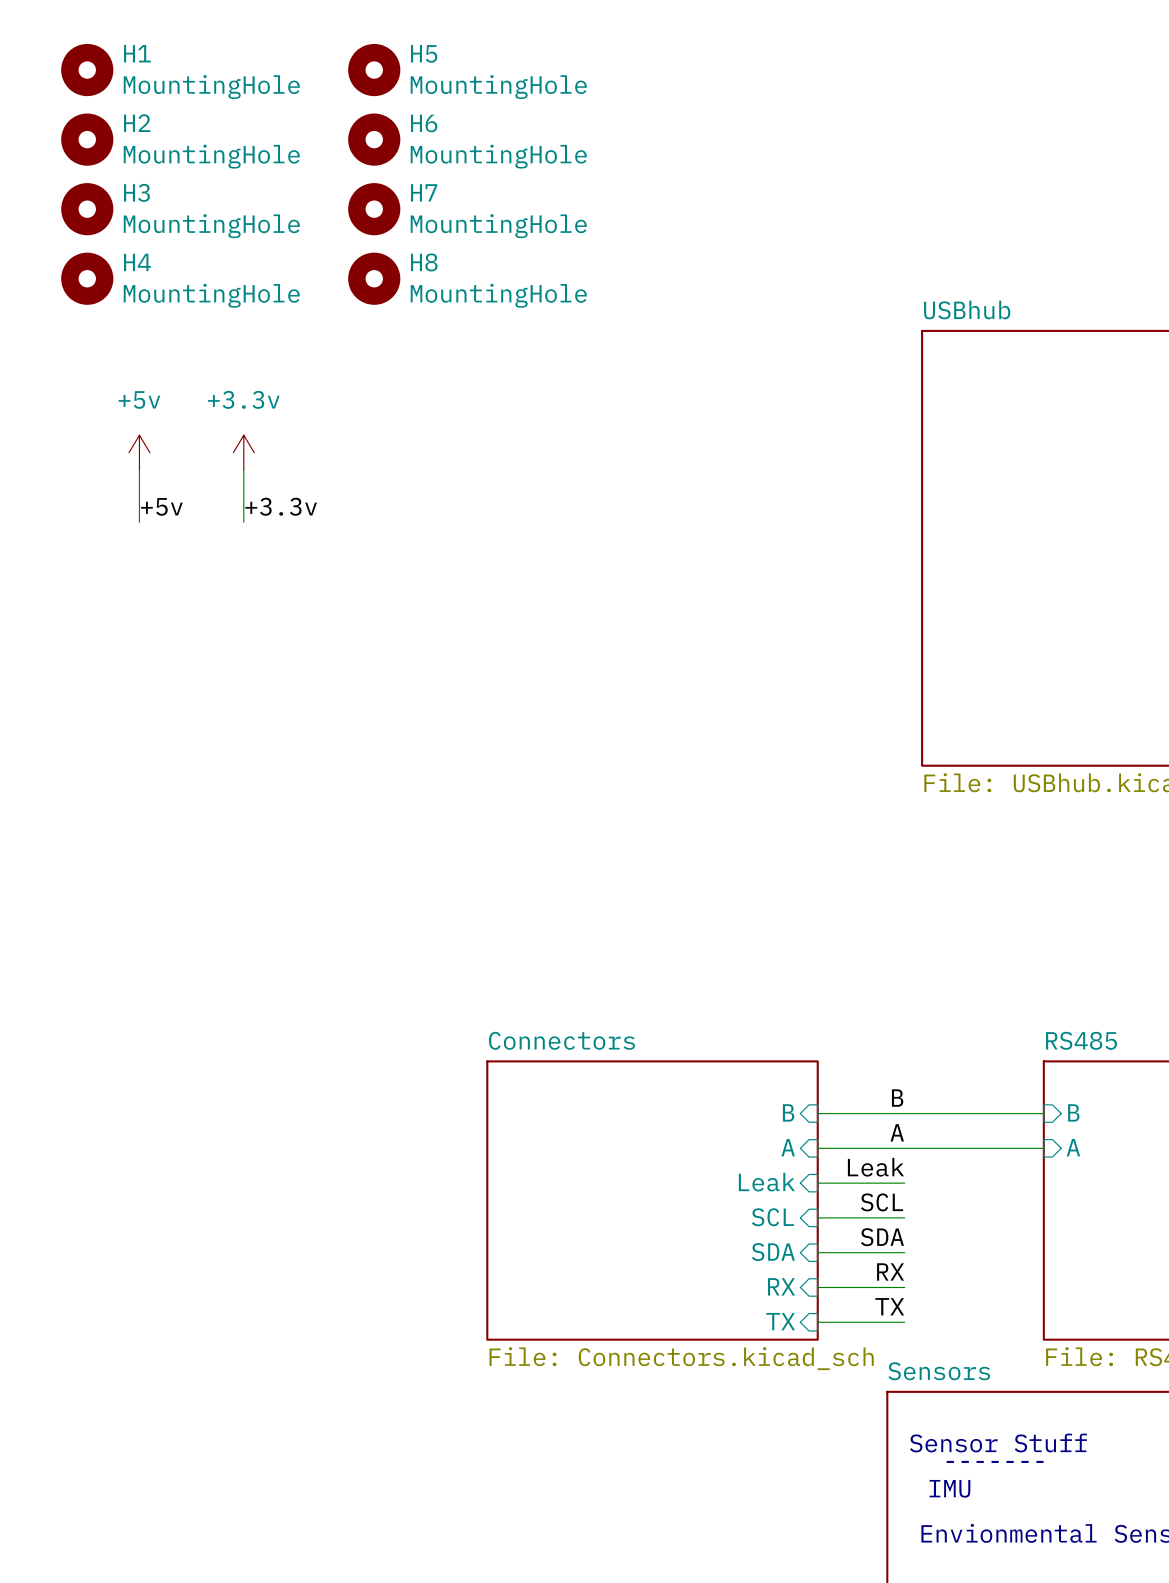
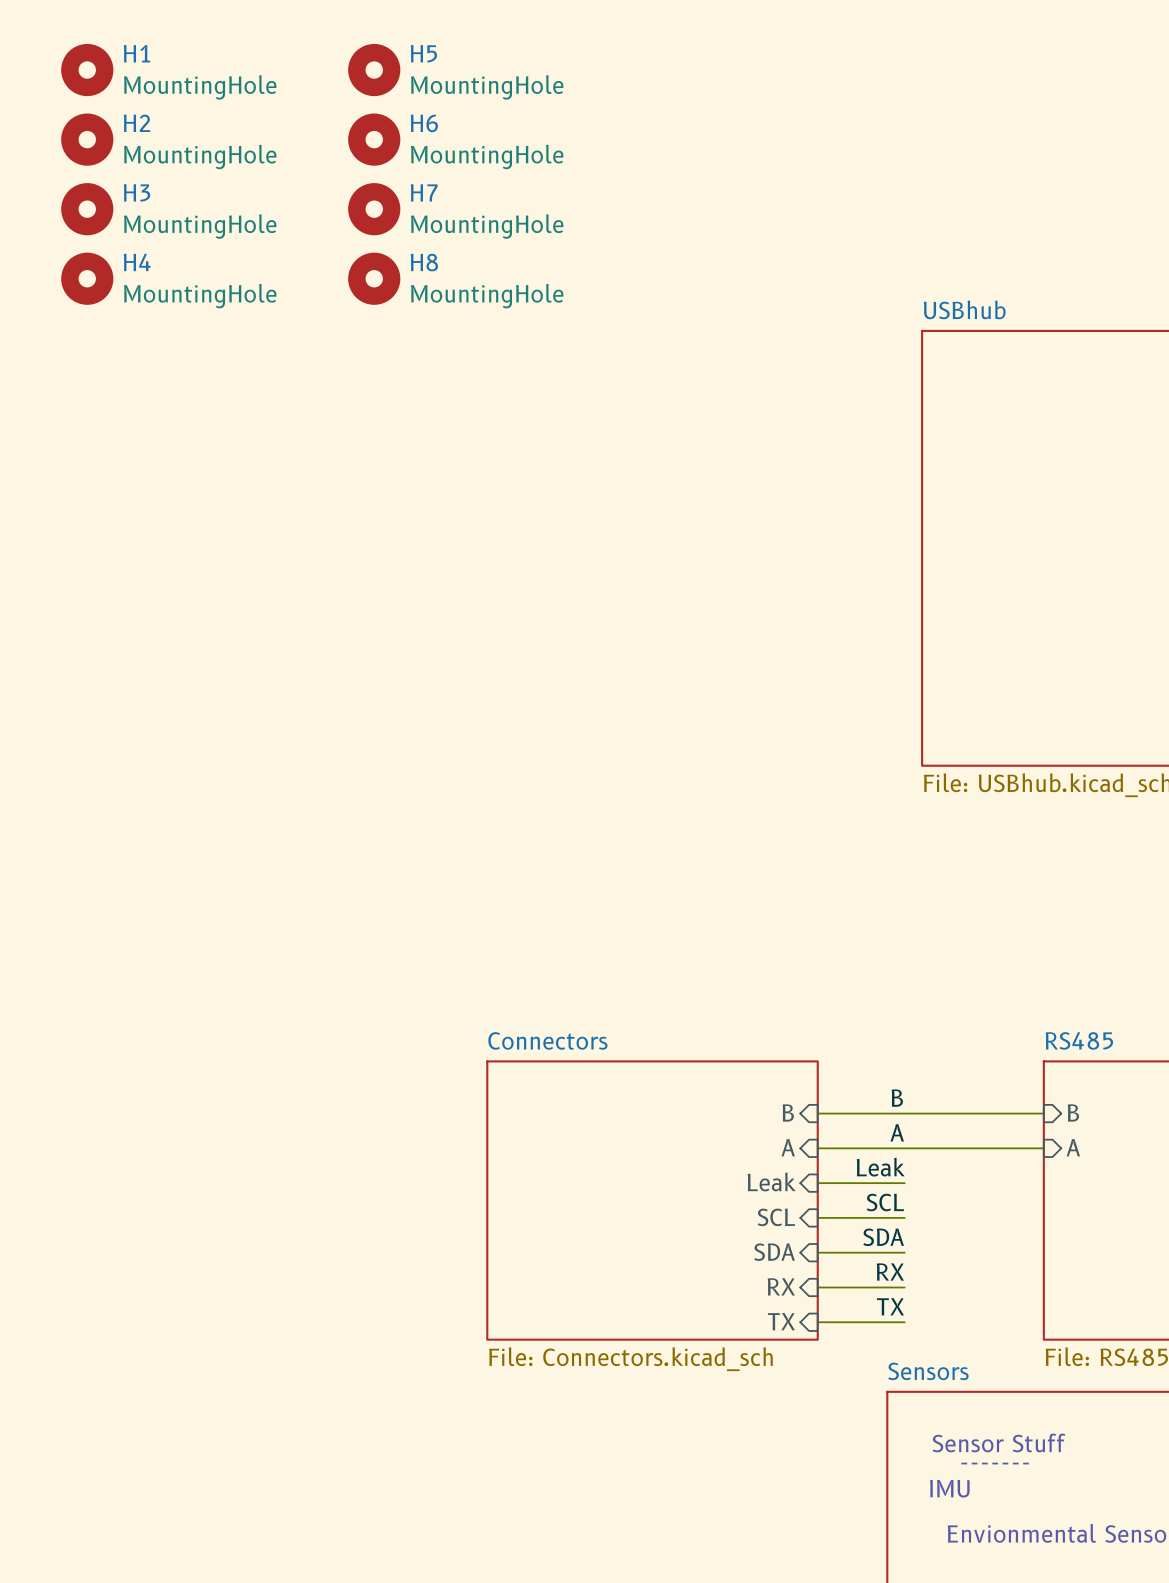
power symbol: +5v (139, 452) -> none
power symbol: +3.3v (243, 452) -> none
wire: (139, 470) (139, 522) -> none
wire: (243, 470) (243, 522) -> none
label: +5v (161, 506) -> none
label: +3.3v (281, 506) -> none

